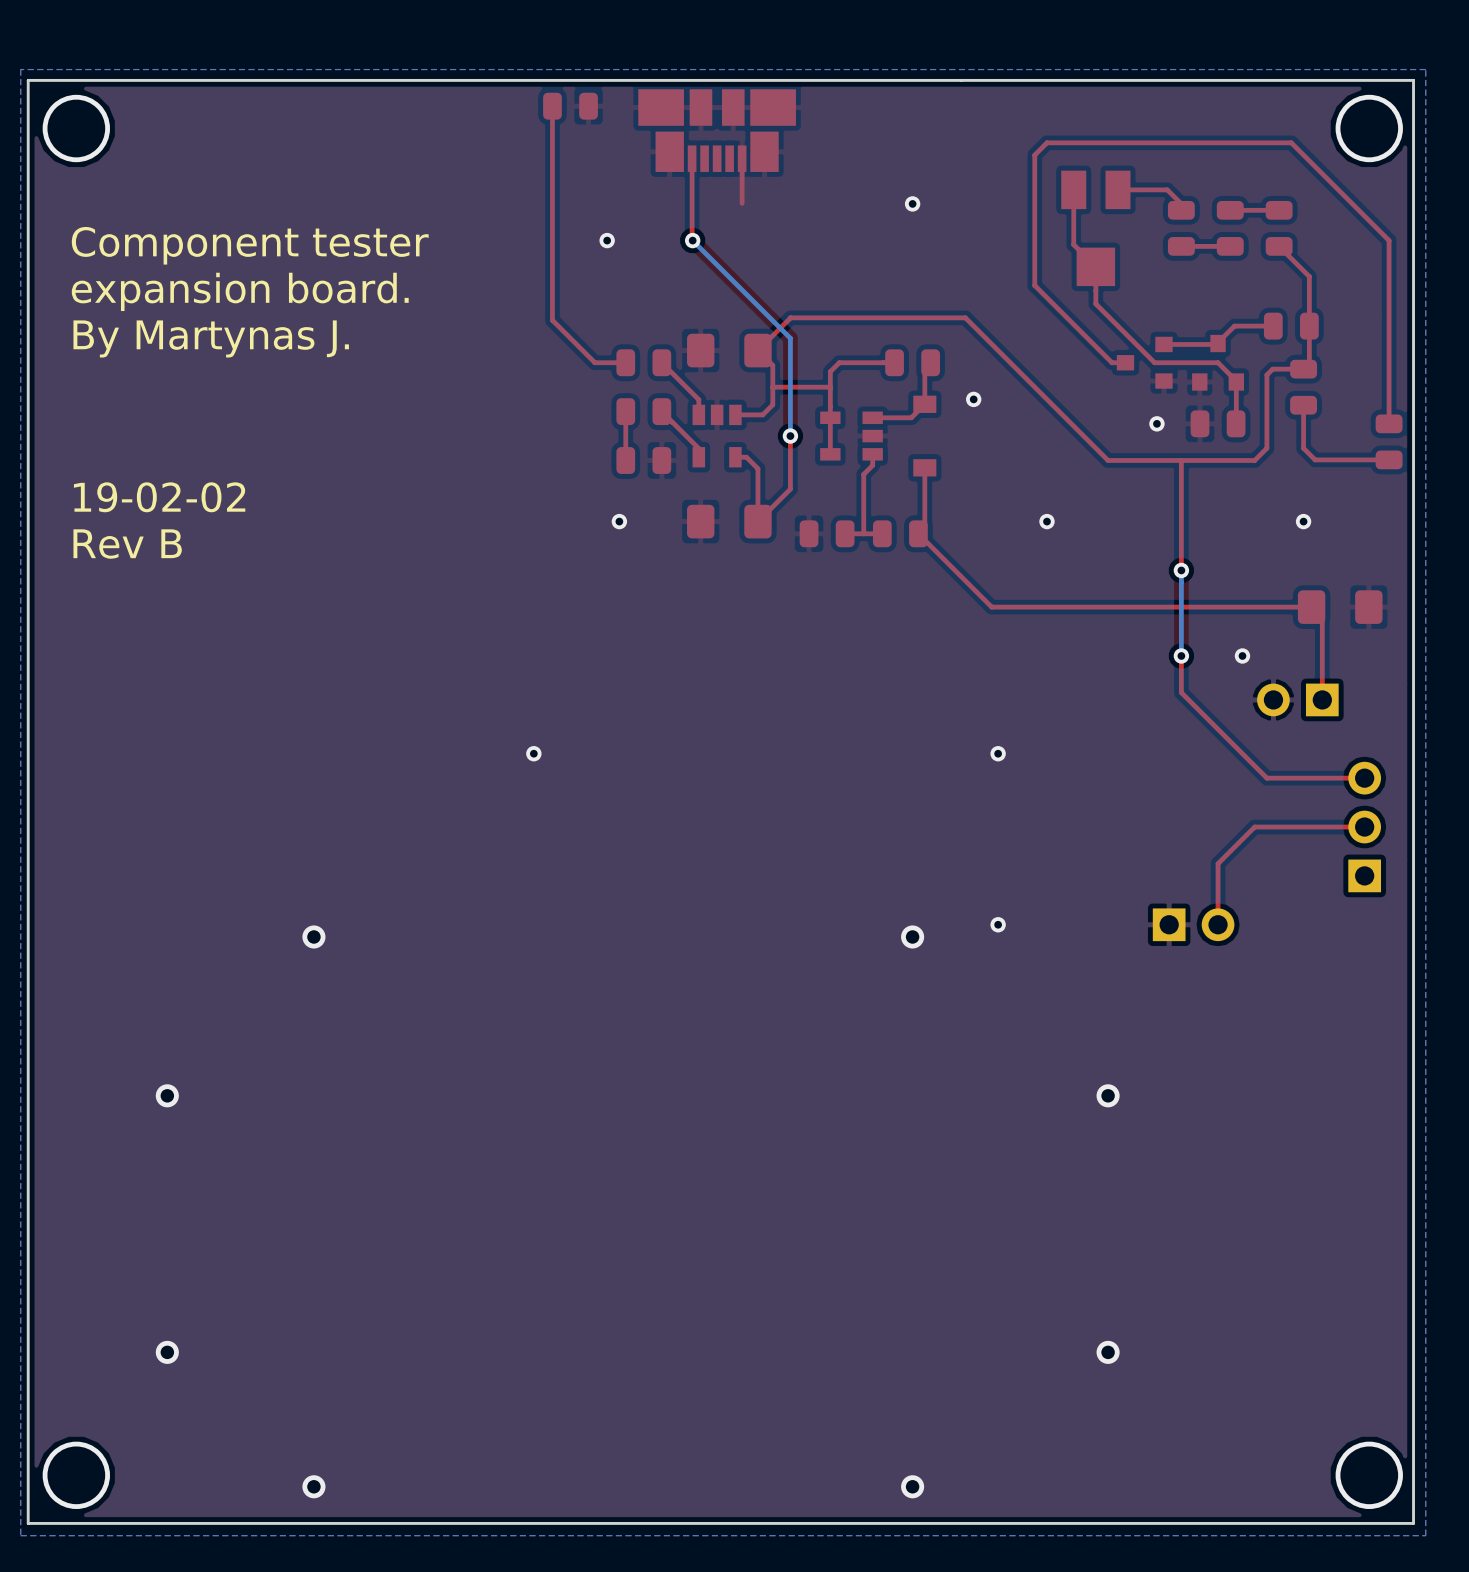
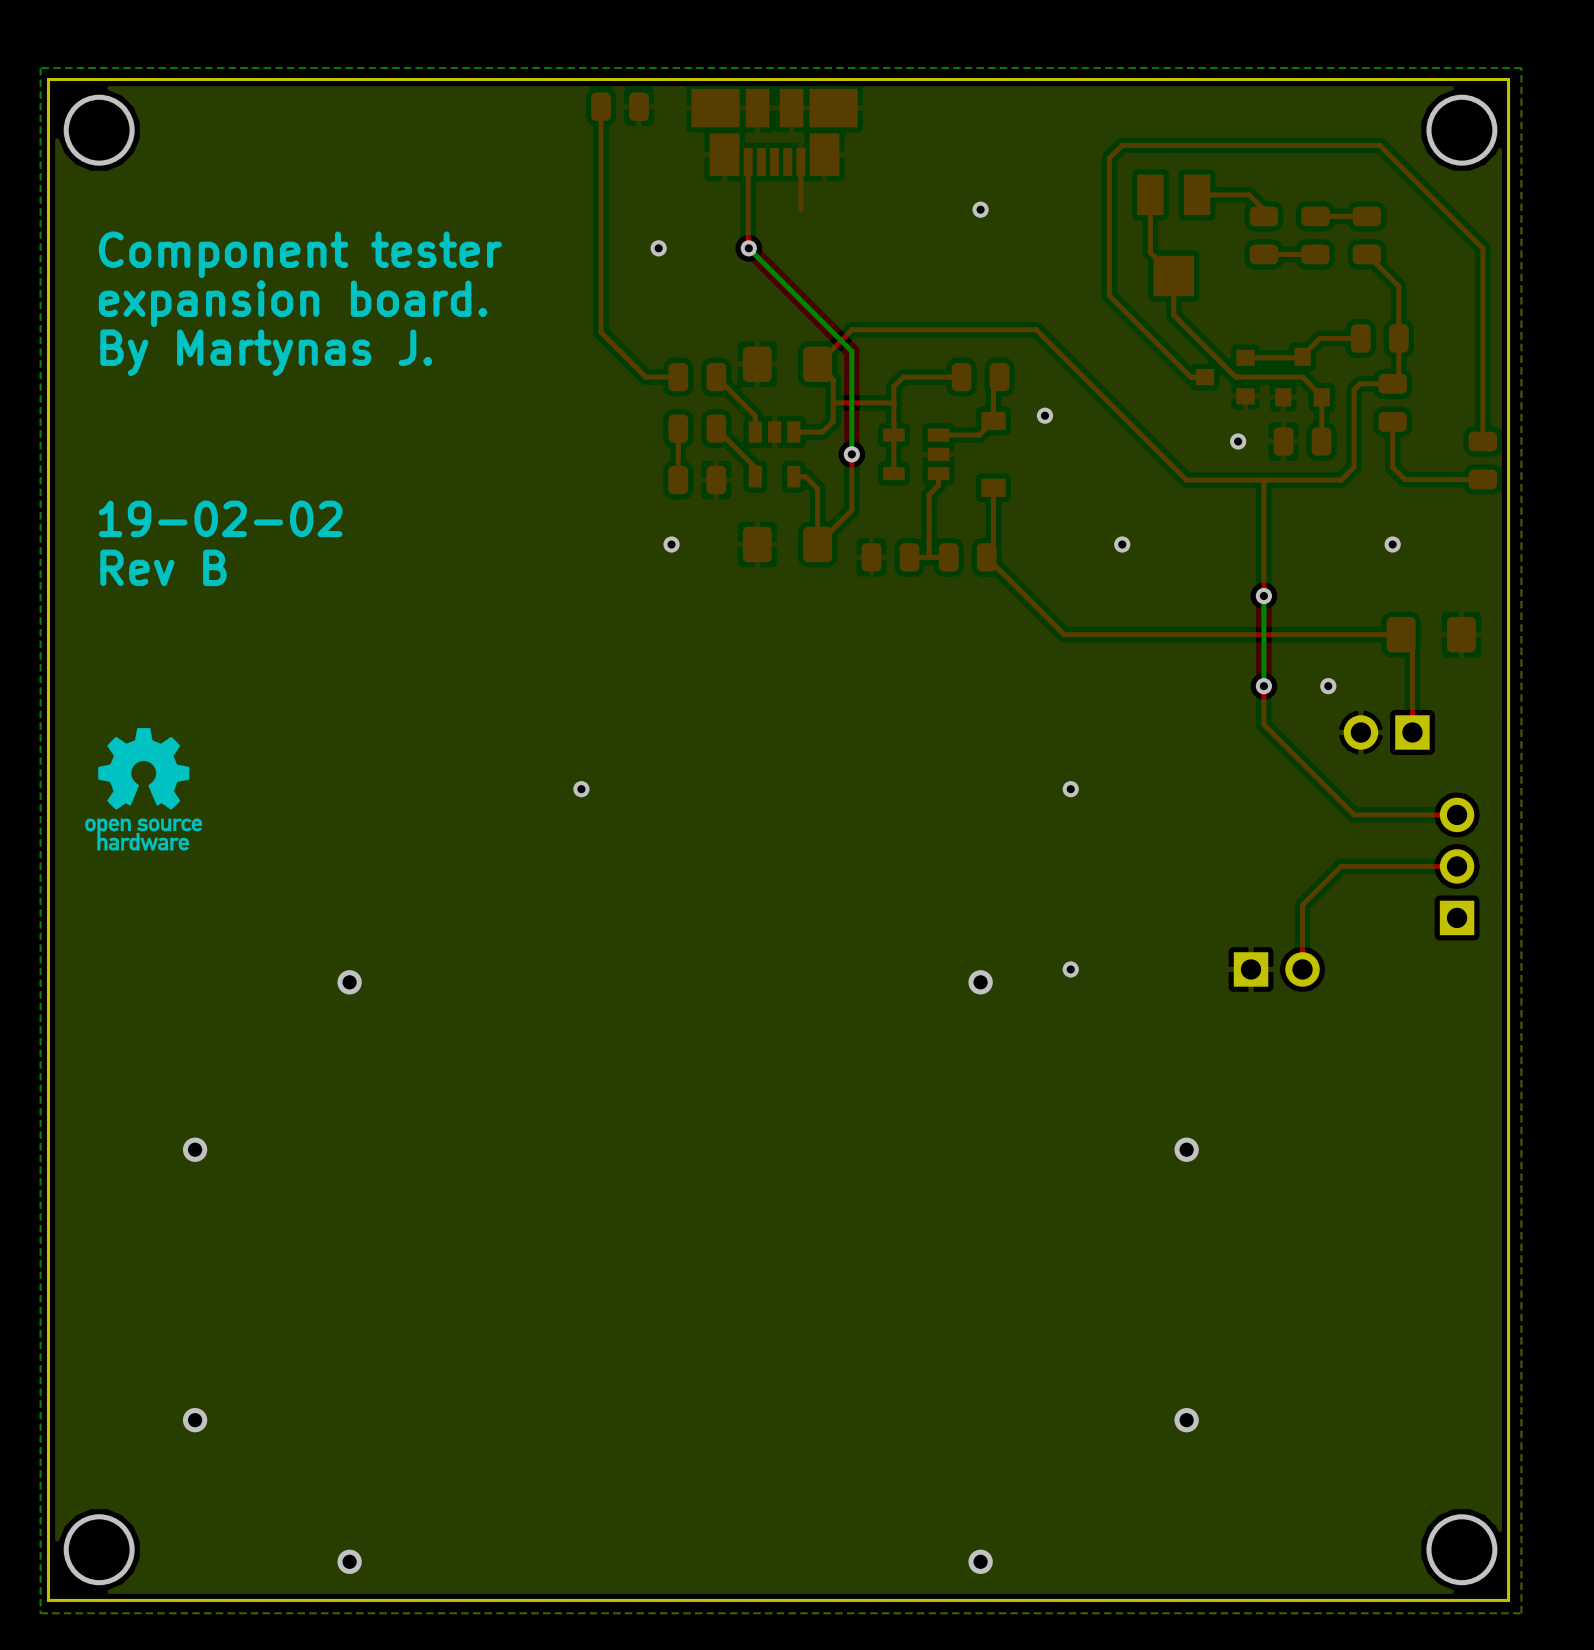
drawing: none -> [85, 728, 203, 851]

